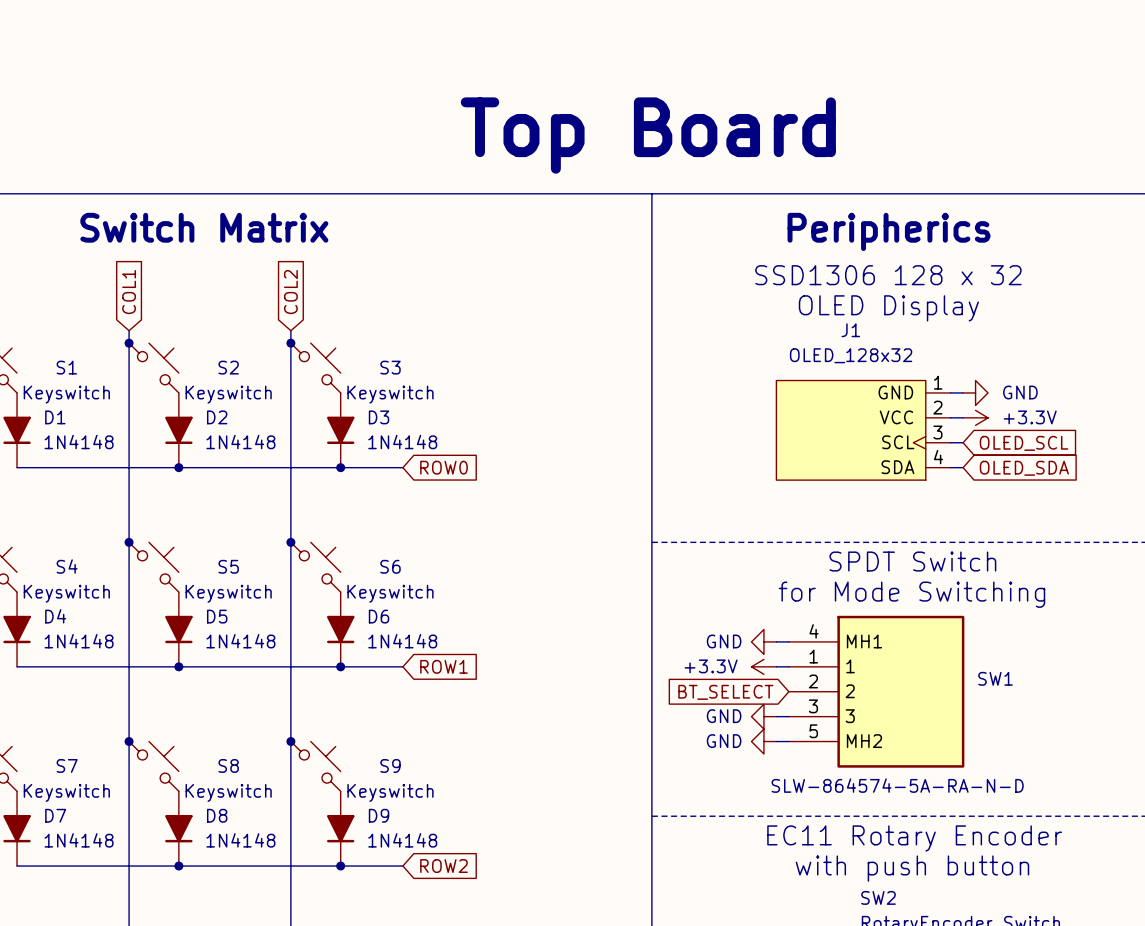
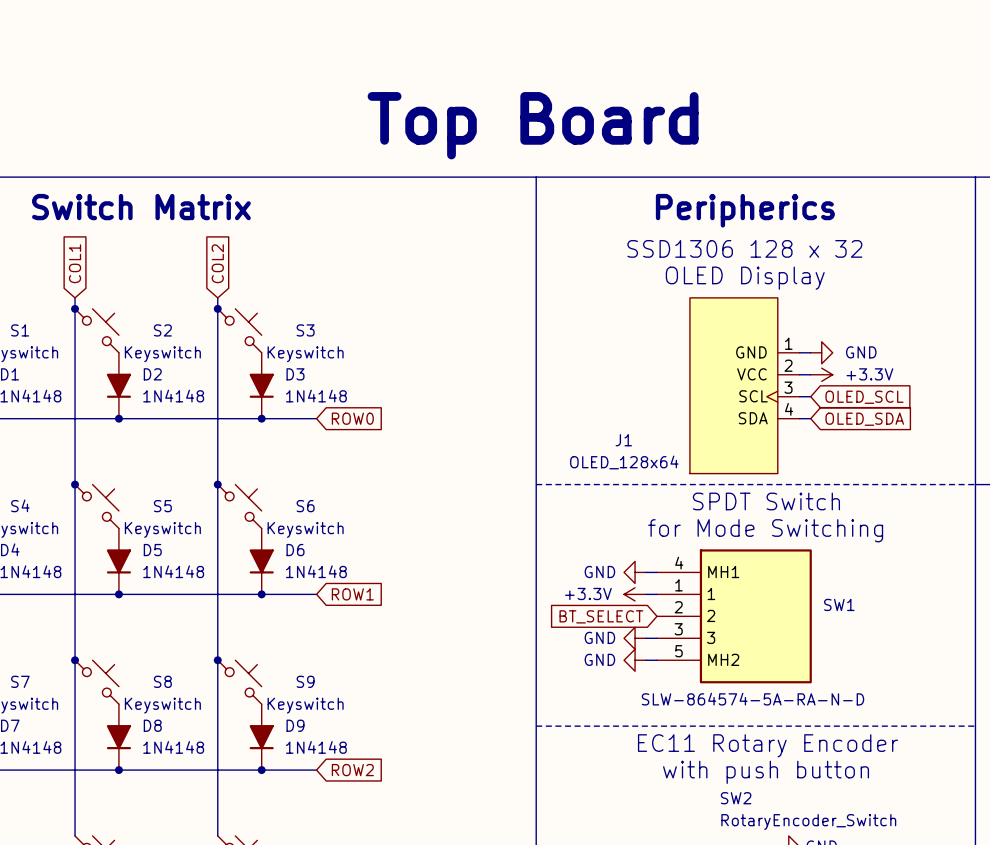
J1 name position: J1 (850, 330) -> J1 (623, 440)
J1 value: OLED_128x32 (851, 355) -> OLED_128x64 (624, 462)
J1 symbol: [776, 380, 951, 481] -> [689, 297, 800, 474]

